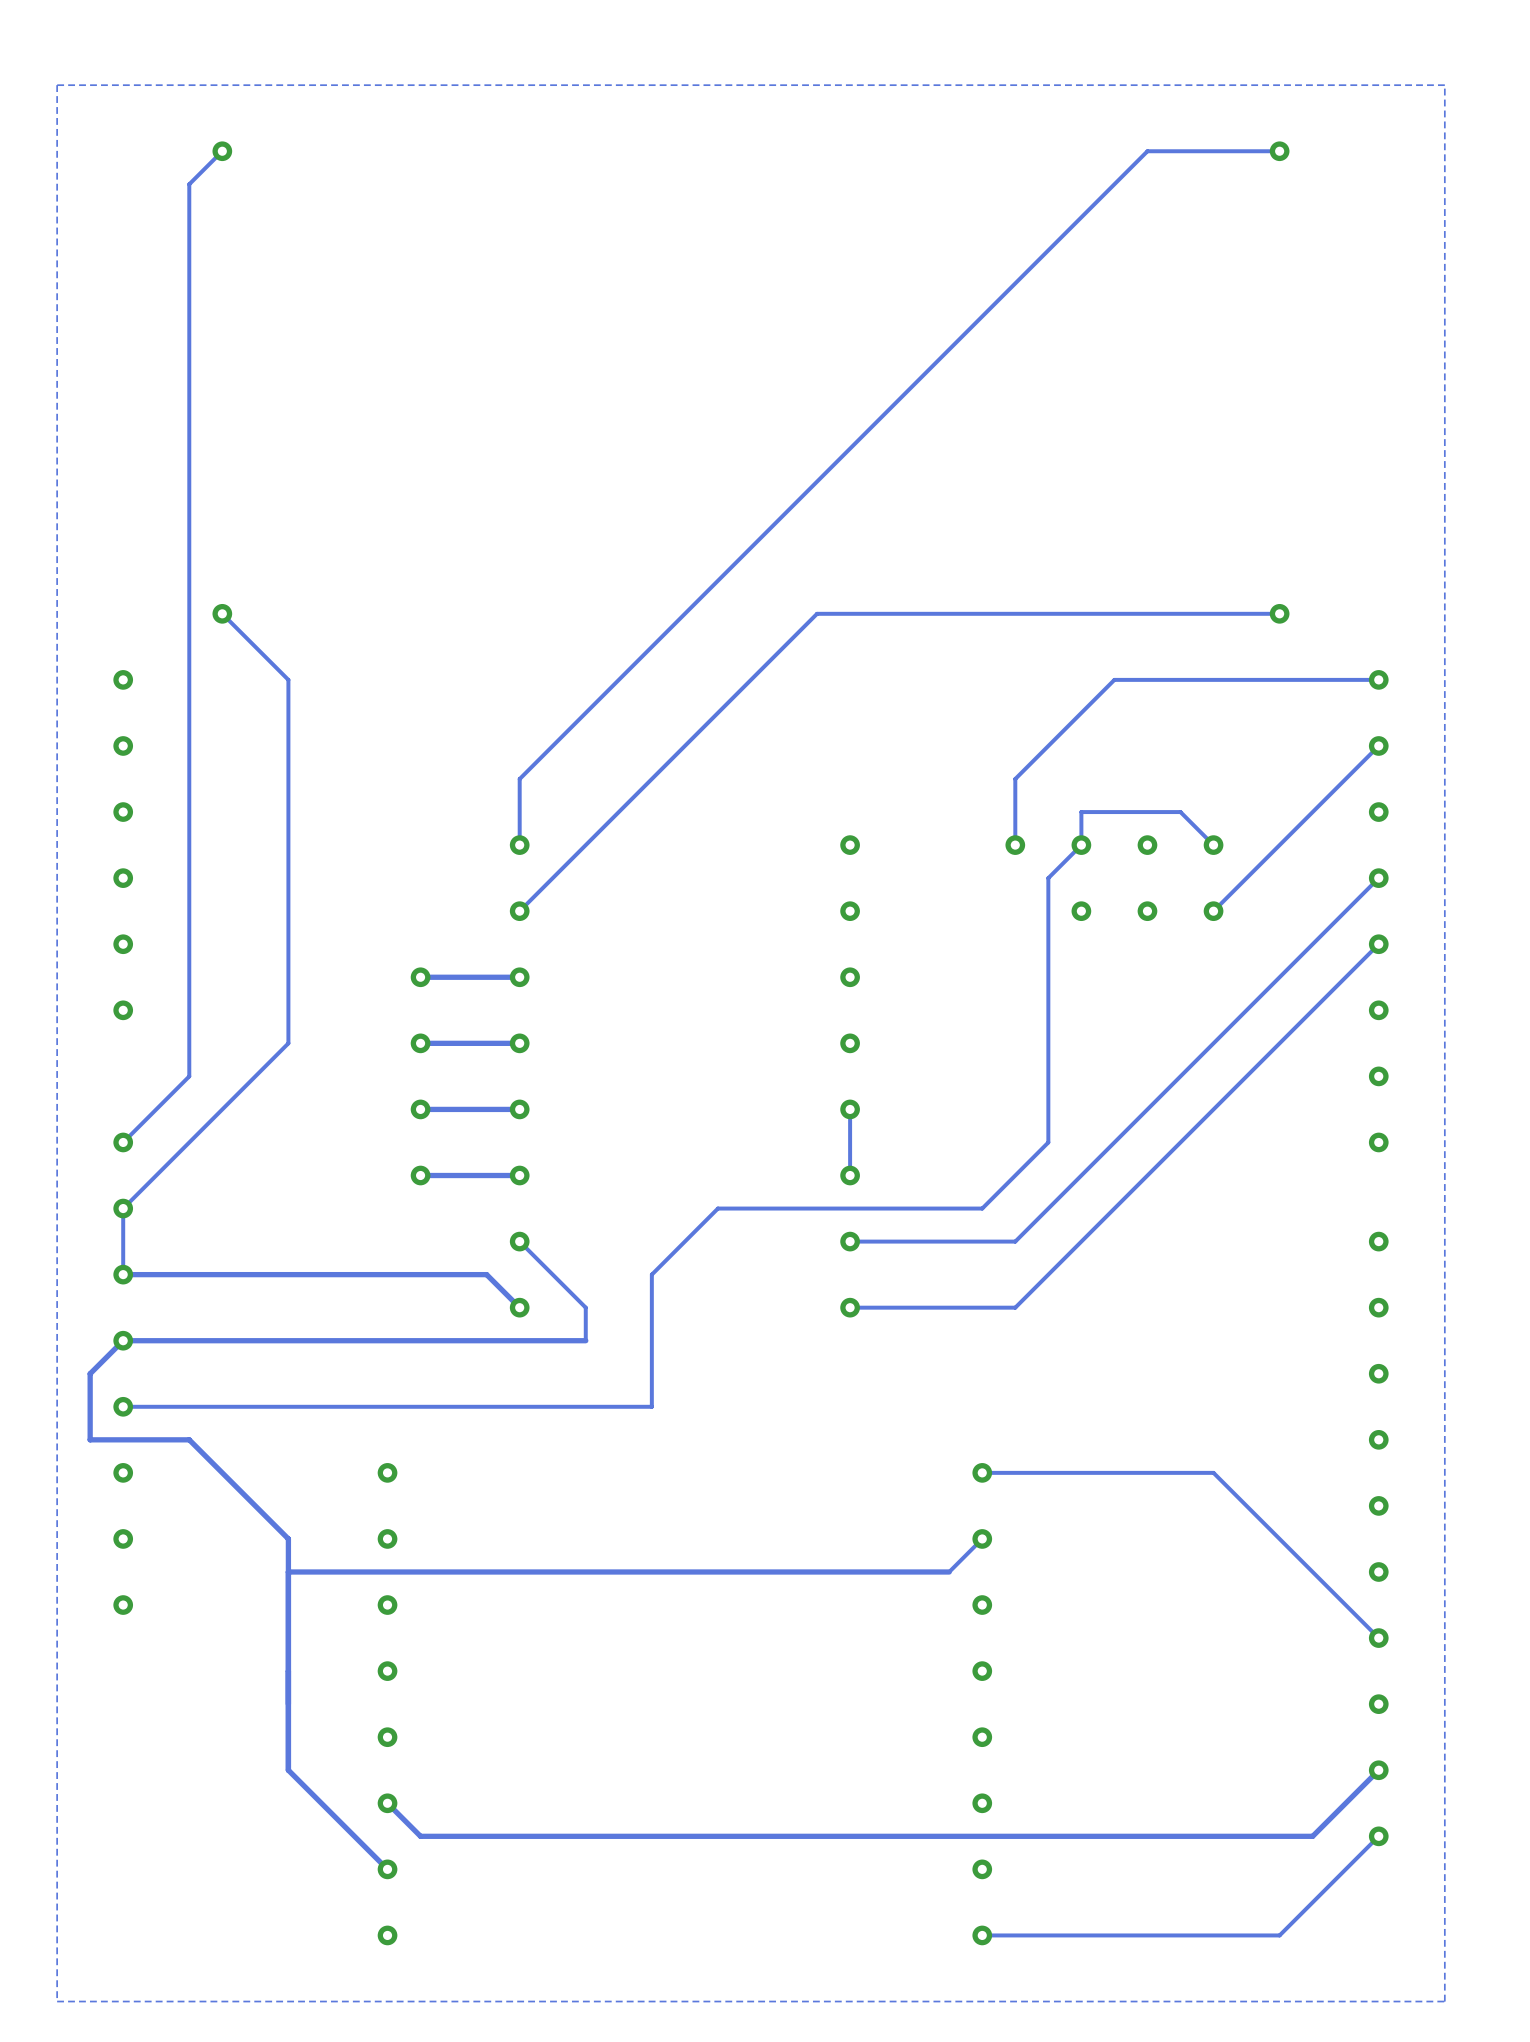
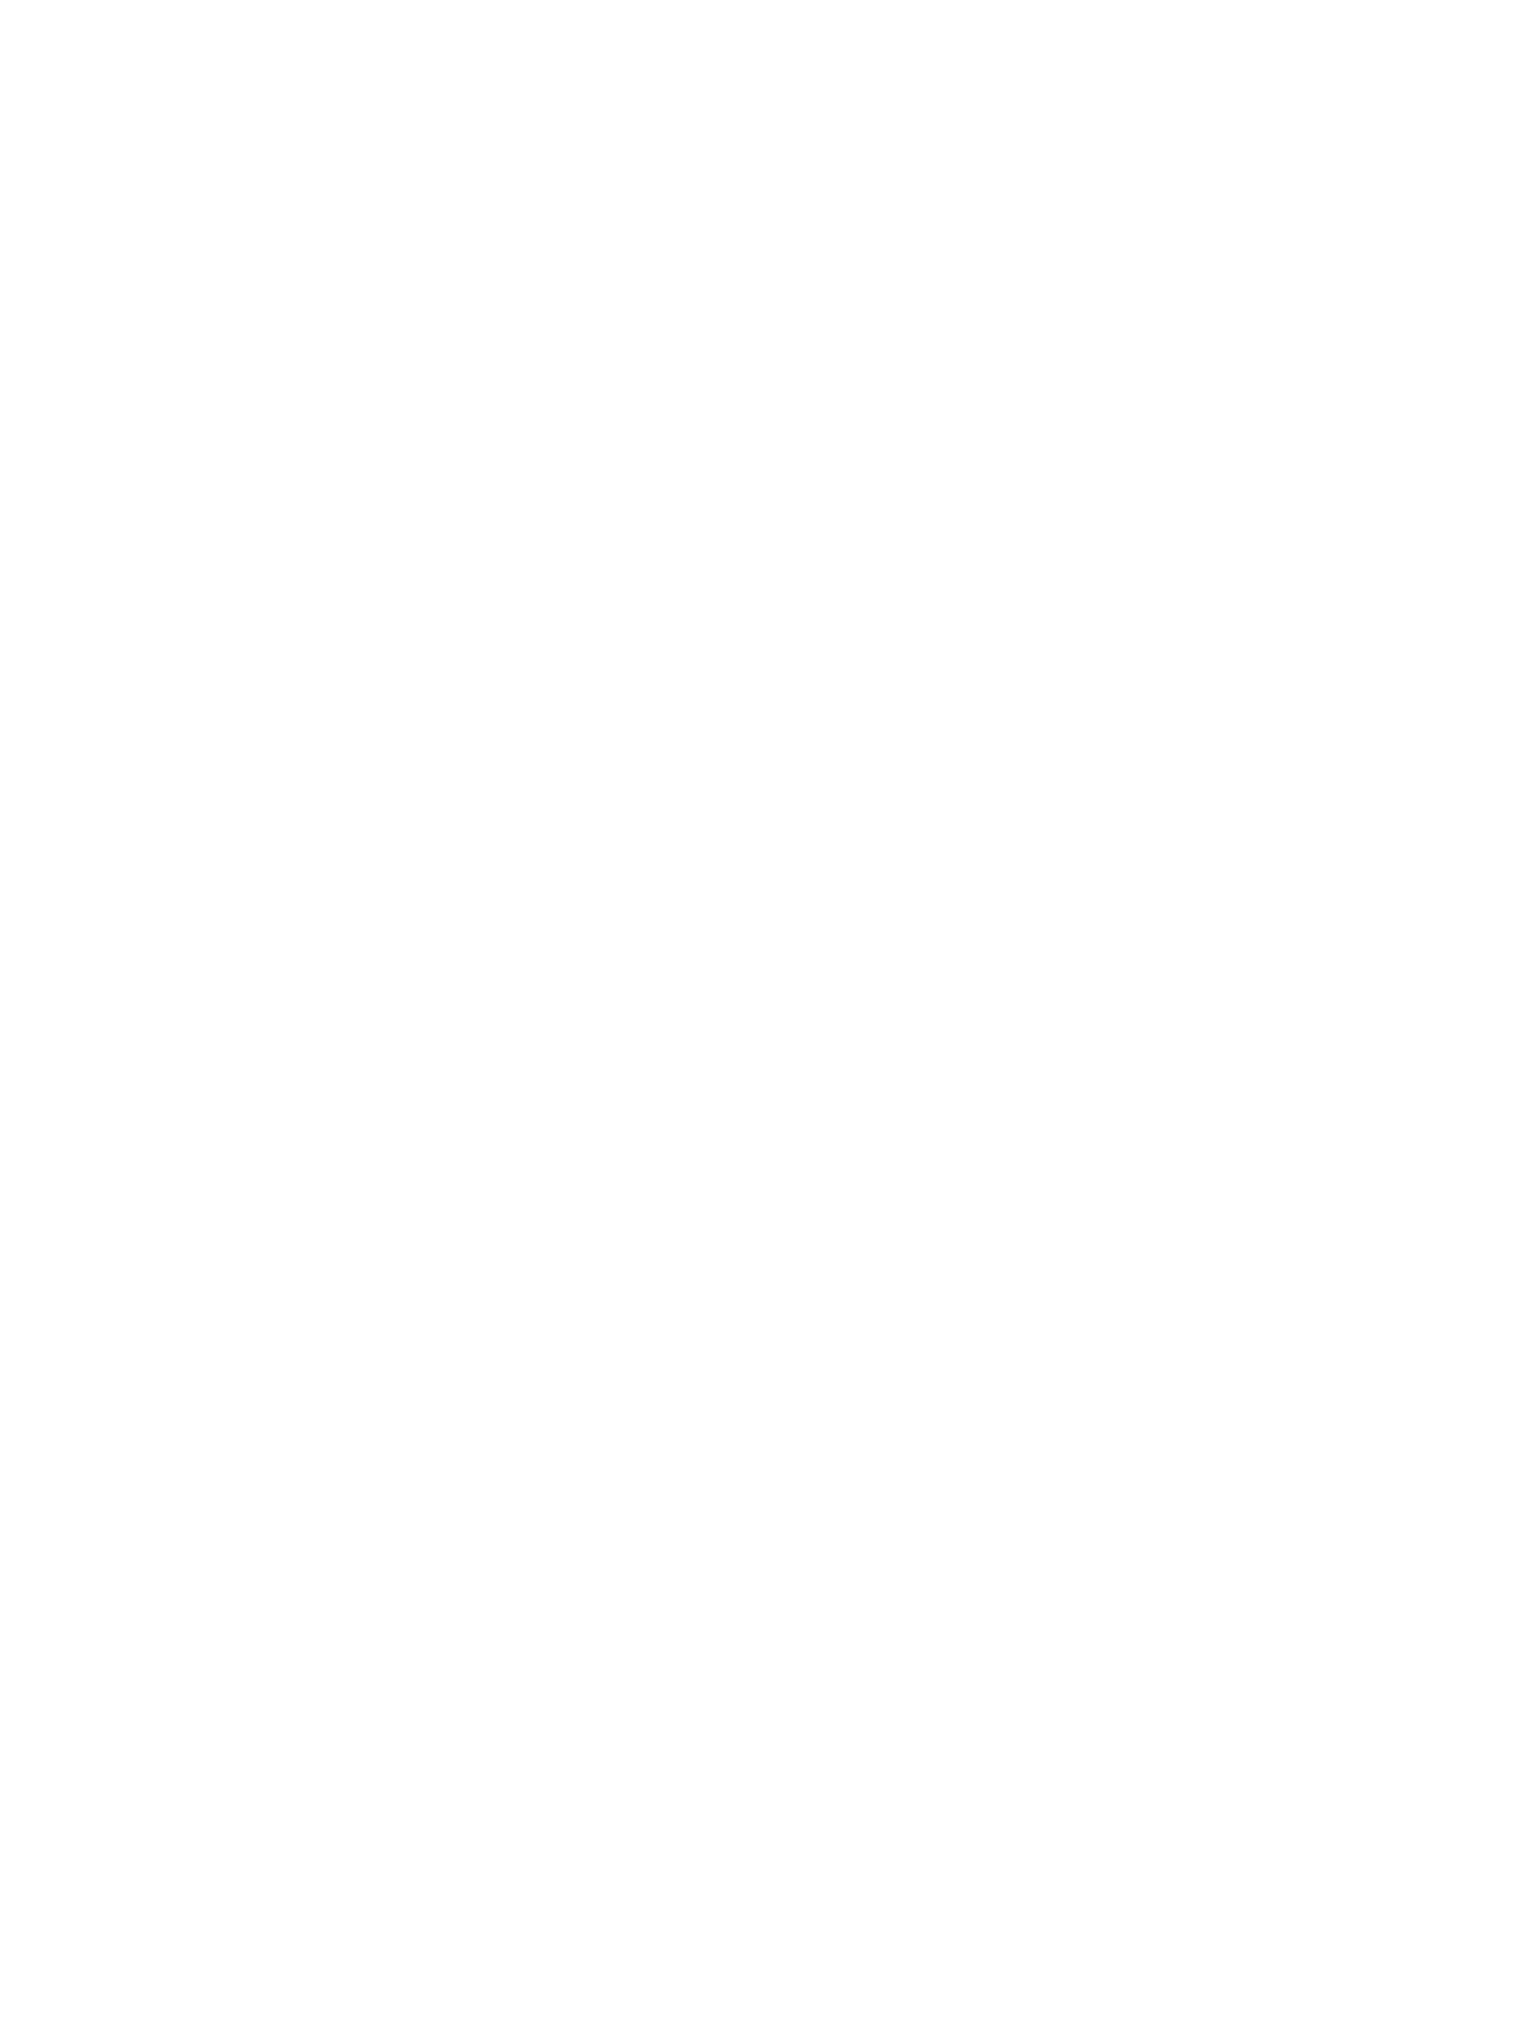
zone outline: (1444, 85) (57, 85) (57, 2001) (1444, 2001) (1444, 85) -> none
track: (222, 151) (189, 184) (189, 1076) (123, 1142) -> none
via: (222, 151) -> none
track: (1279, 151) (1147, 151) (519, 779) (519, 845) -> none
via: (1279, 151) -> none
track: (222, 613) (288, 679) (288, 1043) (123, 1208) (123, 1274) (486, 1274) (519, 1307) -> none
via: (222, 613) -> none
track: (1279, 613) (817, 613) (519, 911) -> none
via: (1279, 613) -> none
via: (123, 679) -> none
track: (1378, 679) (1114, 679) (1015, 779) (1015, 845) -> none
via: (1378, 679) -> none
via: (123, 745) -> none
track: (1378, 745) (1213, 911) -> none
via: (1378, 745) -> none
via: (123, 812) -> none
via: (1378, 812) -> none
via: (519, 845) -> none
via: (850, 845) -> none
via: (1015, 845) -> none
via: (1081, 845) -> none
via: (1147, 845) -> none
track: (1213, 845) (1180, 812) (1081, 812) (1081, 845) (1048, 878) (1048, 1142) (982, 1208) (717, 1208) (651, 1274) (651, 1406) (123, 1406) -> none
via: (1213, 845) -> none
via: (123, 878) -> none
track: (1378, 878) (1015, 1241) (850, 1241) -> none
via: (1378, 878) -> none
via: (519, 911) -> none
via: (850, 911) -> none
via: (1081, 911) -> none
via: (1147, 911) -> none
via: (1213, 911) -> none
via: (123, 944) -> none
track: (1378, 944) (1015, 1307) (850, 1307) -> none
via: (1378, 944) -> none
via: (420, 977) -> none
track: (519, 977) (420, 977) -> none
via: (519, 977) -> none
via: (850, 977) -> none
via: (123, 1010) -> none
via: (1378, 1010) -> none
via: (420, 1043) -> none
track: (519, 1043) (420, 1043) -> none
via: (519, 1043) -> none
via: (850, 1043) -> none
via: (1378, 1076) -> none
via: (420, 1109) -> none
track: (519, 1109) (420, 1109) -> none
via: (519, 1109) -> none
track: (850, 1109) (850, 1175) -> none
via: (850, 1109) -> none
via: (123, 1142) -> none
via: (1378, 1142) -> none
via: (420, 1175) -> none
track: (519, 1175) (420, 1175) -> none
via: (519, 1175) -> none
via: (850, 1175) -> none
via: (123, 1208) -> none
track: (519, 1241) (585, 1307) (585, 1340) (123, 1340) (90, 1373) (90, 1439) (189, 1439) (288, 1538) (288, 1770) (387, 1869) -> none
via: (519, 1241) -> none
via: (850, 1241) -> none
via: (1378, 1241) -> none
via: (123, 1274) -> none
via: (519, 1307) -> none
via: (850, 1307) -> none
via: (1378, 1307) -> none
via: (123, 1340) -> none
via: (1378, 1373) -> none
via: (123, 1406) -> none
via: (1378, 1439) -> none
via: (123, 1472) -> none
via: (387, 1472) -> none
track: (982, 1472) (1213, 1472) (1378, 1638) -> none
via: (982, 1472) -> none
via: (1378, 1505) -> none
via: (123, 1538) -> none
via: (387, 1538) -> none
track: (982, 1538) (949, 1571) (288, 1571) -> none
via: (982, 1538) -> none
via: (1378, 1571) -> none
via: (123, 1605) -> none
via: (387, 1605) -> none
via: (982, 1605) -> none
via: (1378, 1638) -> none
via: (387, 1671) -> none
via: (982, 1671) -> none
via: (1378, 1704) -> none
via: (387, 1737) -> none
via: (982, 1737) -> none
track: (1378, 1770) (1312, 1836) (420, 1836) (387, 1803) -> none
via: (1378, 1770) -> none
via: (387, 1803) -> none
via: (982, 1803) -> none
track: (1378, 1836) (1279, 1935) (982, 1935) -> none
via: (1378, 1836) -> none
via: (387, 1869) -> none
via: (982, 1869) -> none
via: (387, 1935) -> none
via: (982, 1935) -> none

